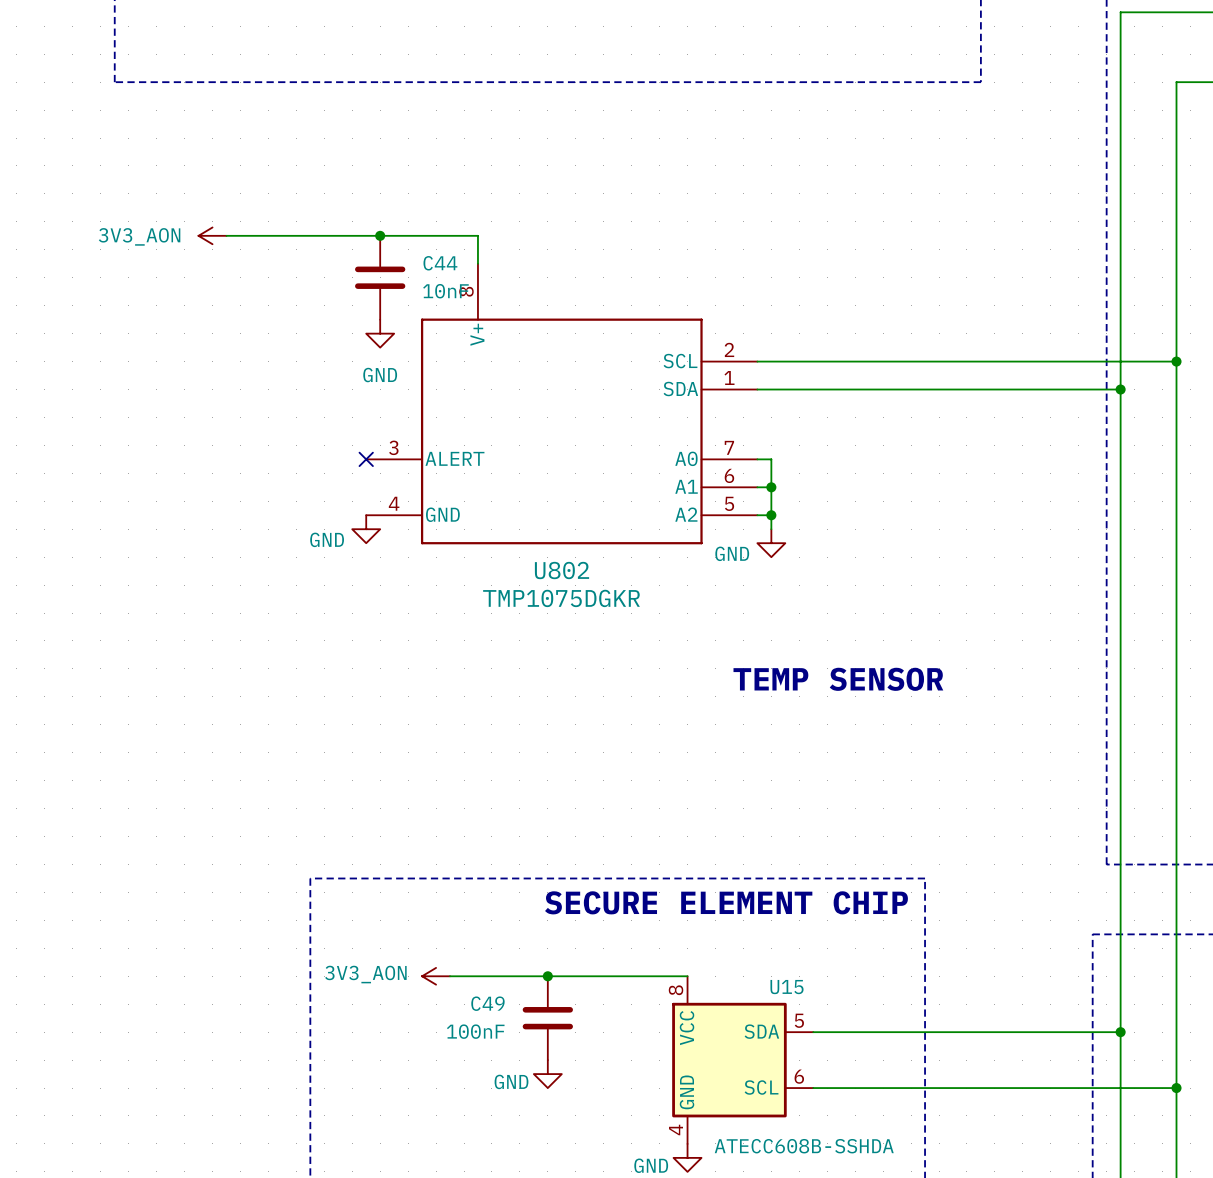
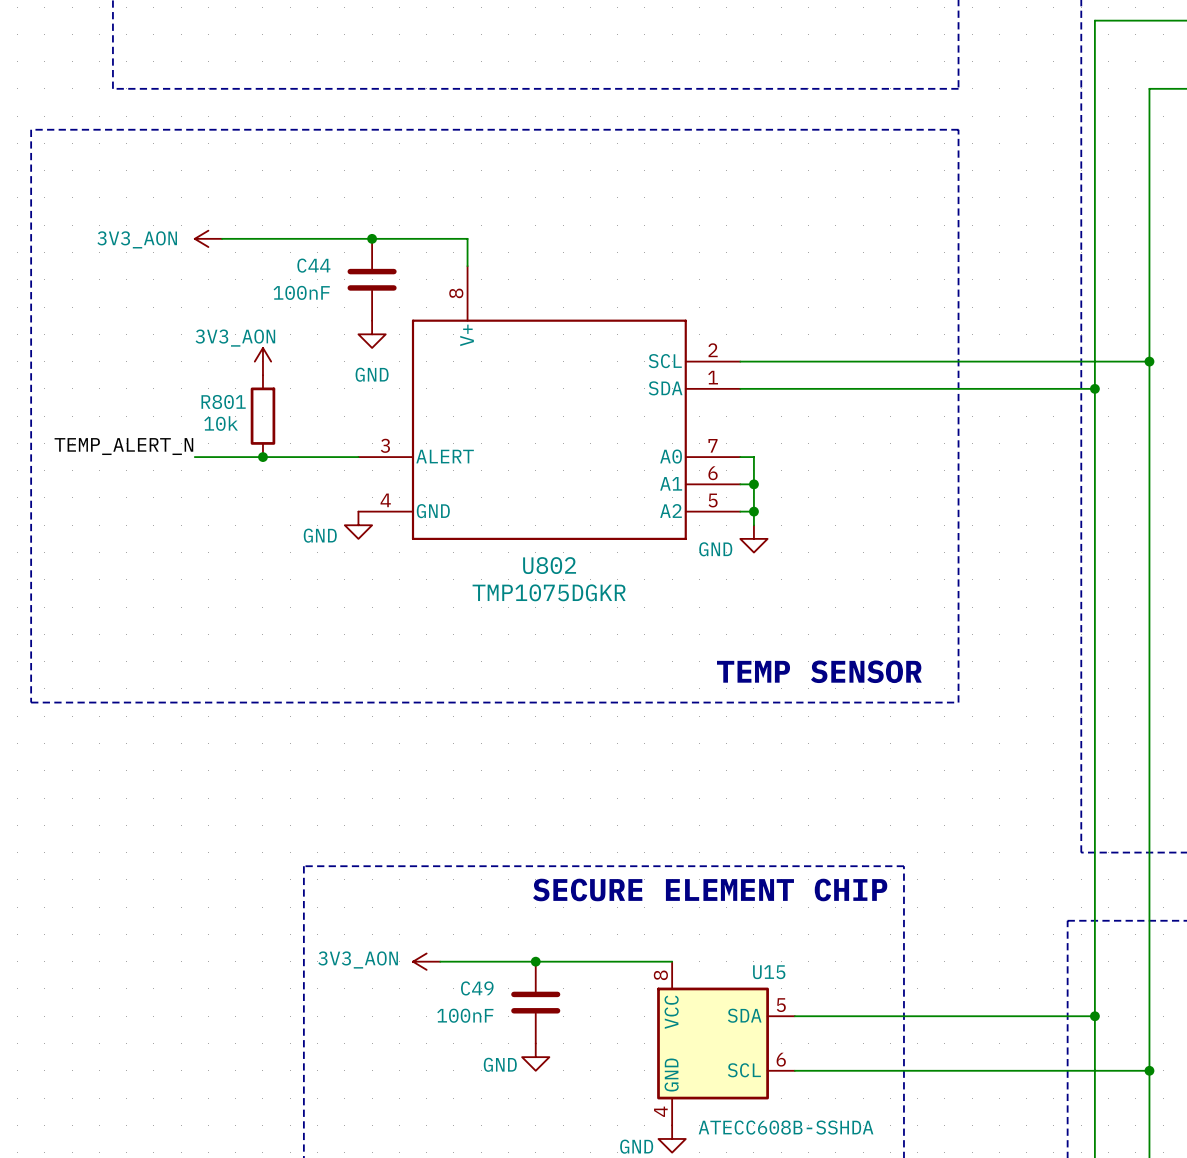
line: none -> (31, 129) (958, 129) (958, 702) (31, 702) (31, 129)
C44 name position: C44 (440, 263) -> C44 (313, 265)
C44 value: 10nF (445, 291) -> 100nF (301, 292)
power symbol: none -> 3V3_AON (262, 361)
R801: none -> 10k (262, 416)
label: none -> TEMP_ALERT_N (123, 446)
wire: none -> (194, 457) (358, 457)
junction: none -> (262, 457)
no-connect mark: (366, 459) -> none

